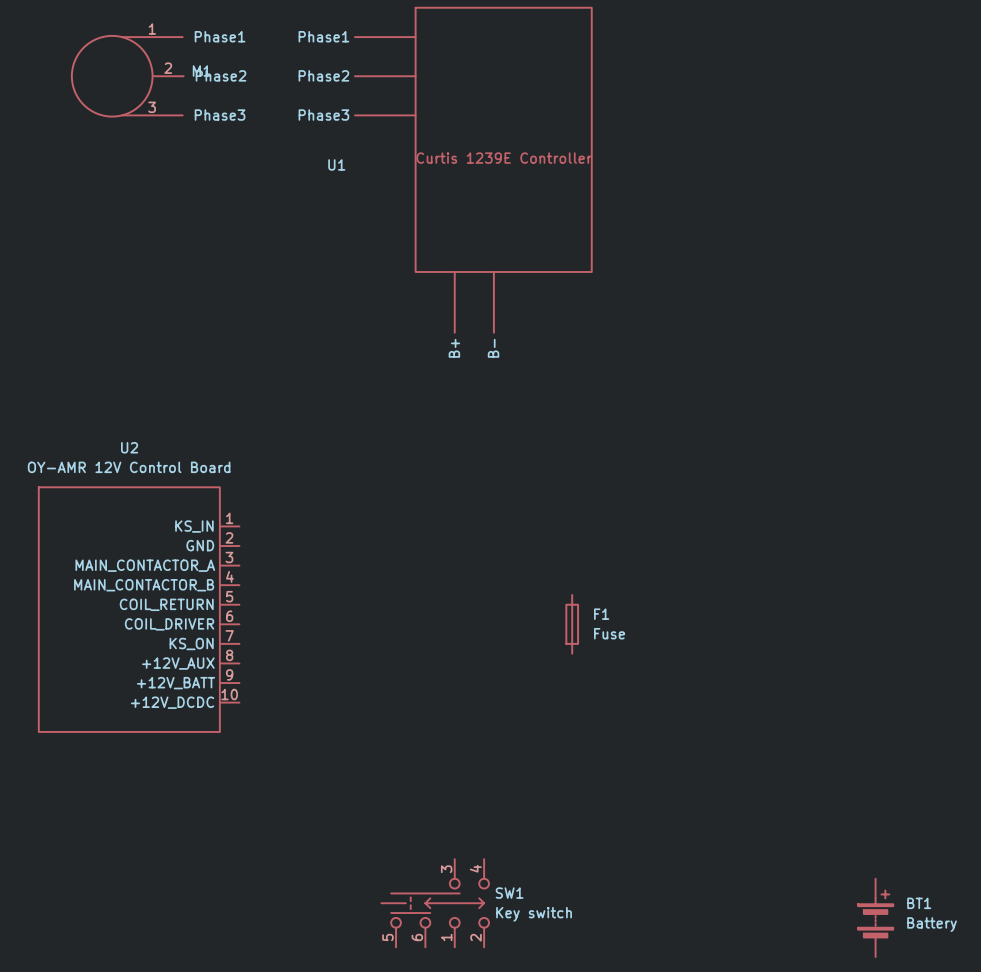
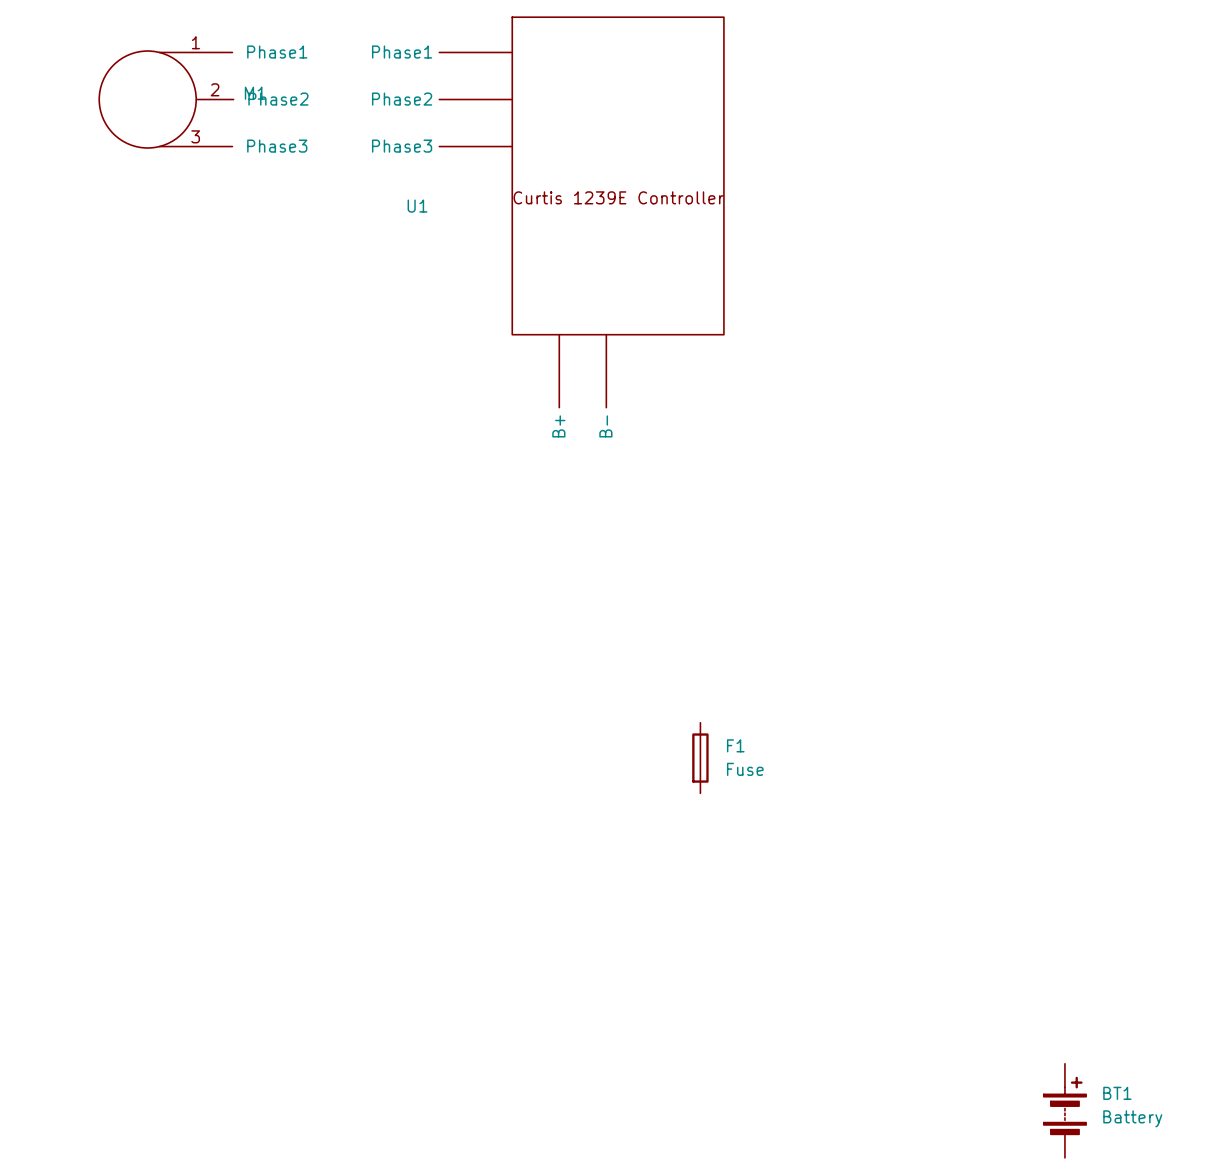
U2: OY-AMR 12V Control Board (139, 609) -> none
SW1: Key switch (435, 903) -> none

